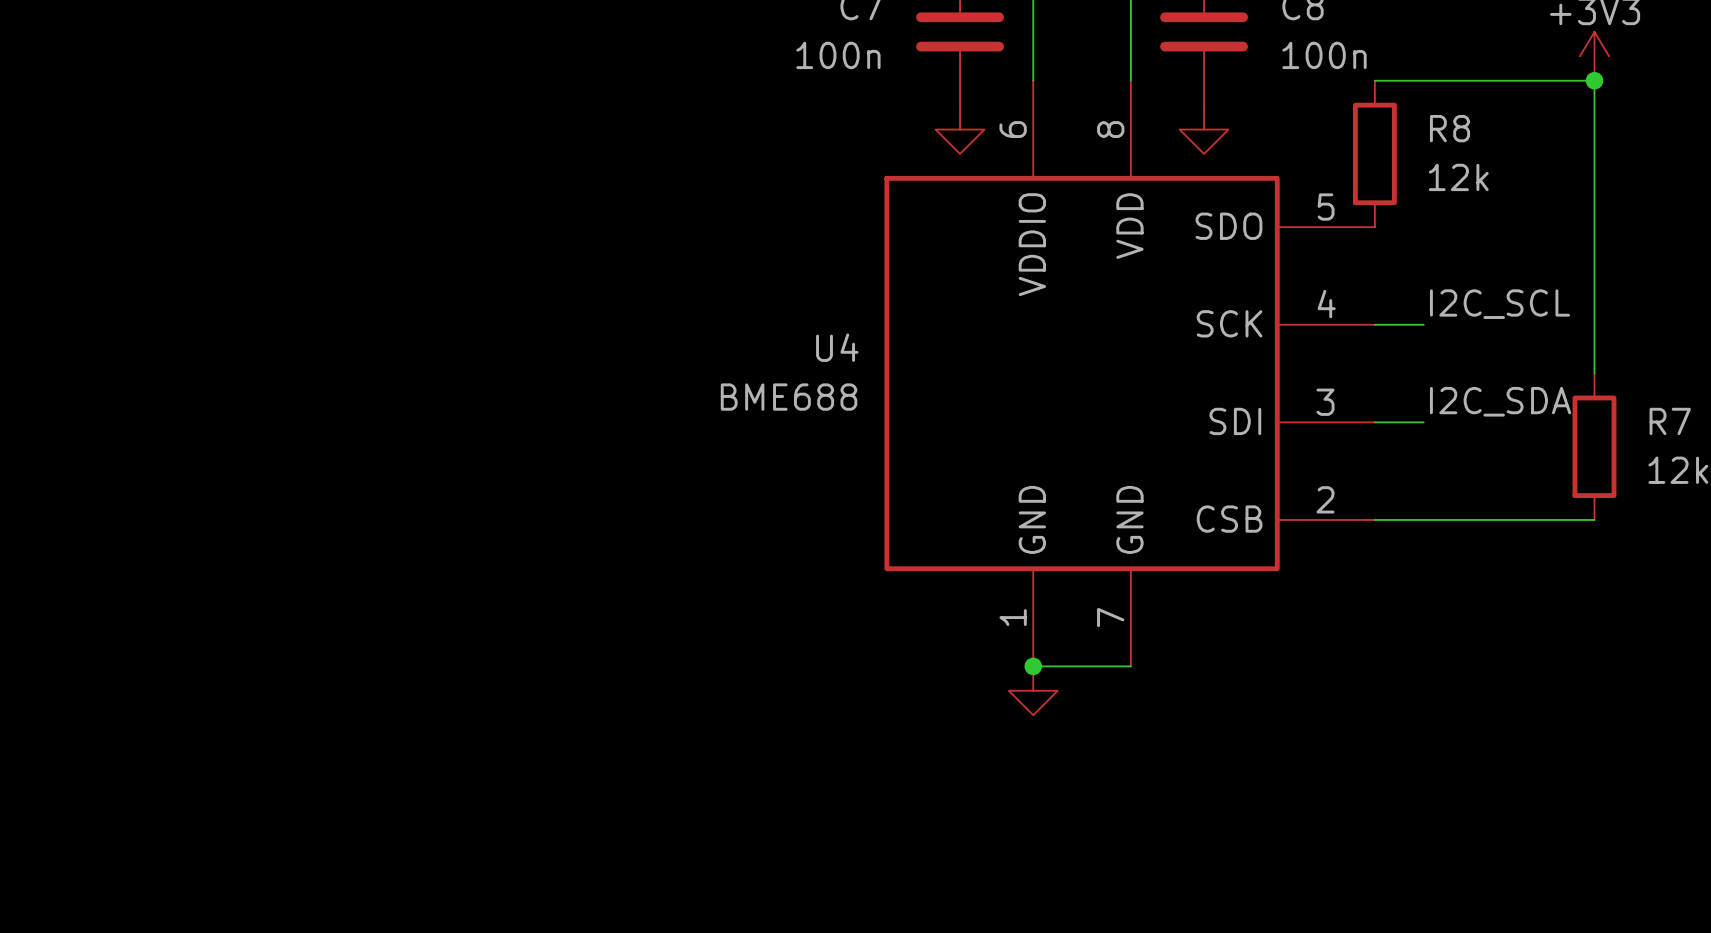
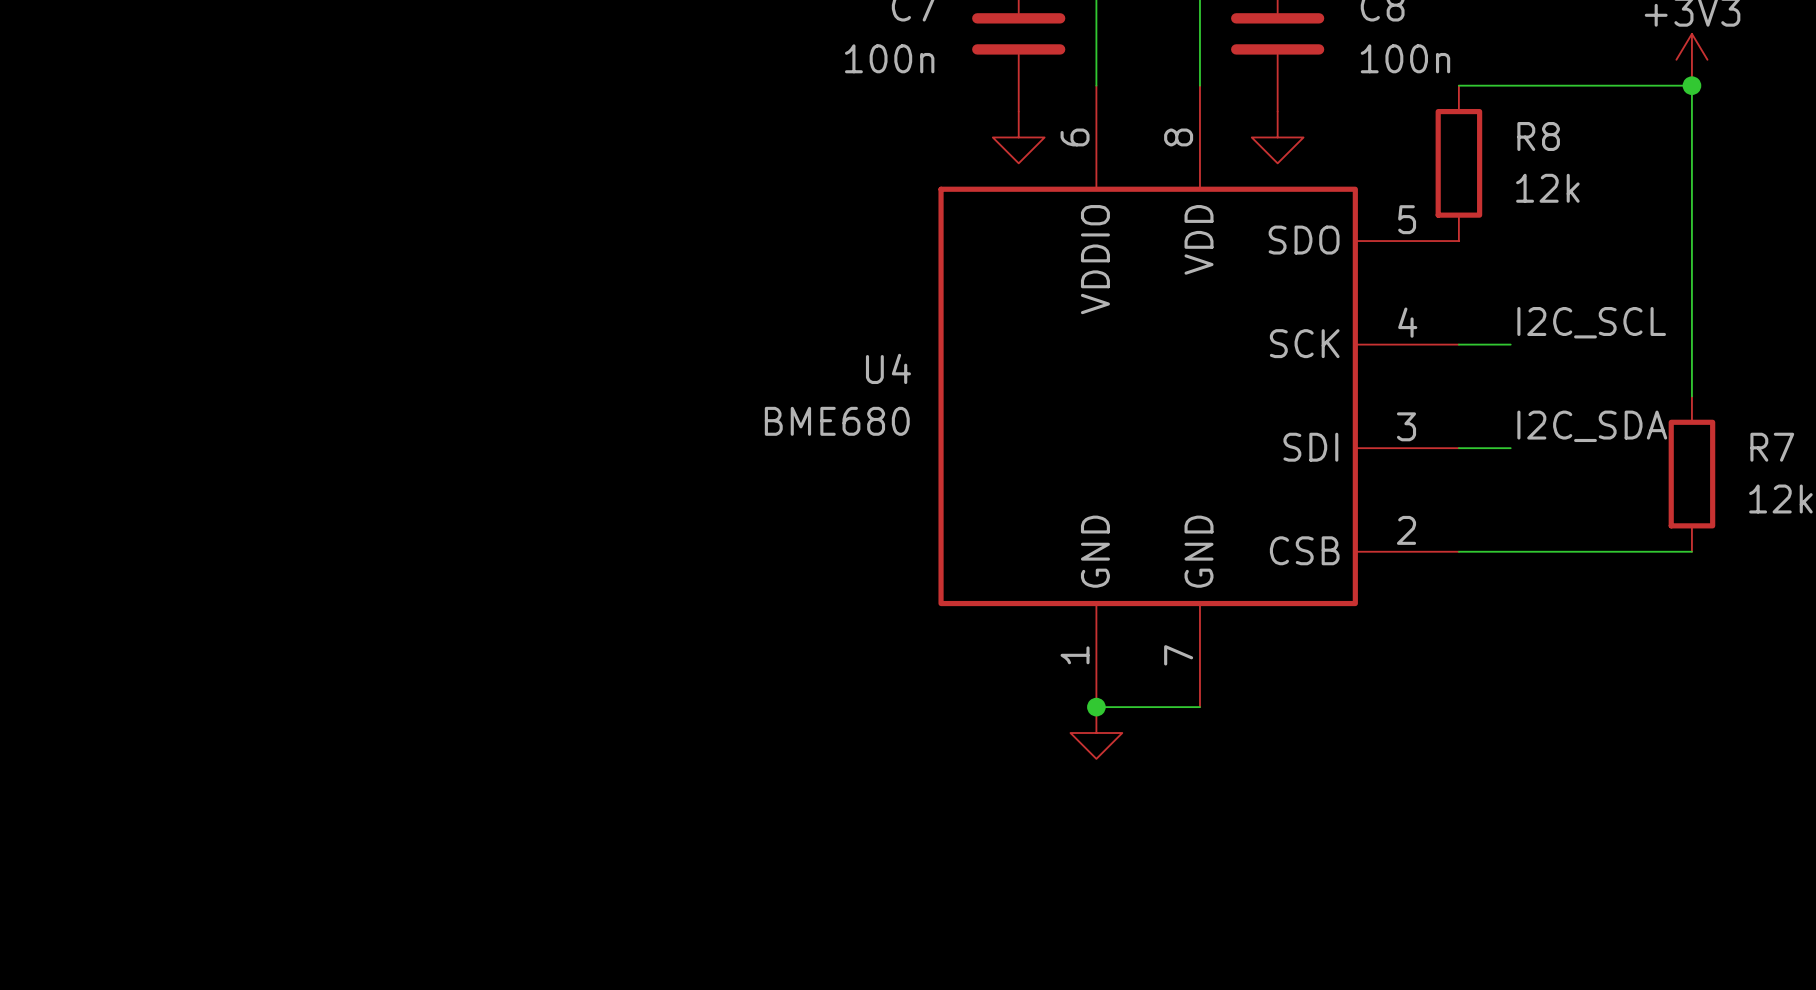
U4 value: BME688 (789, 397) -> BME680 (837, 421)

